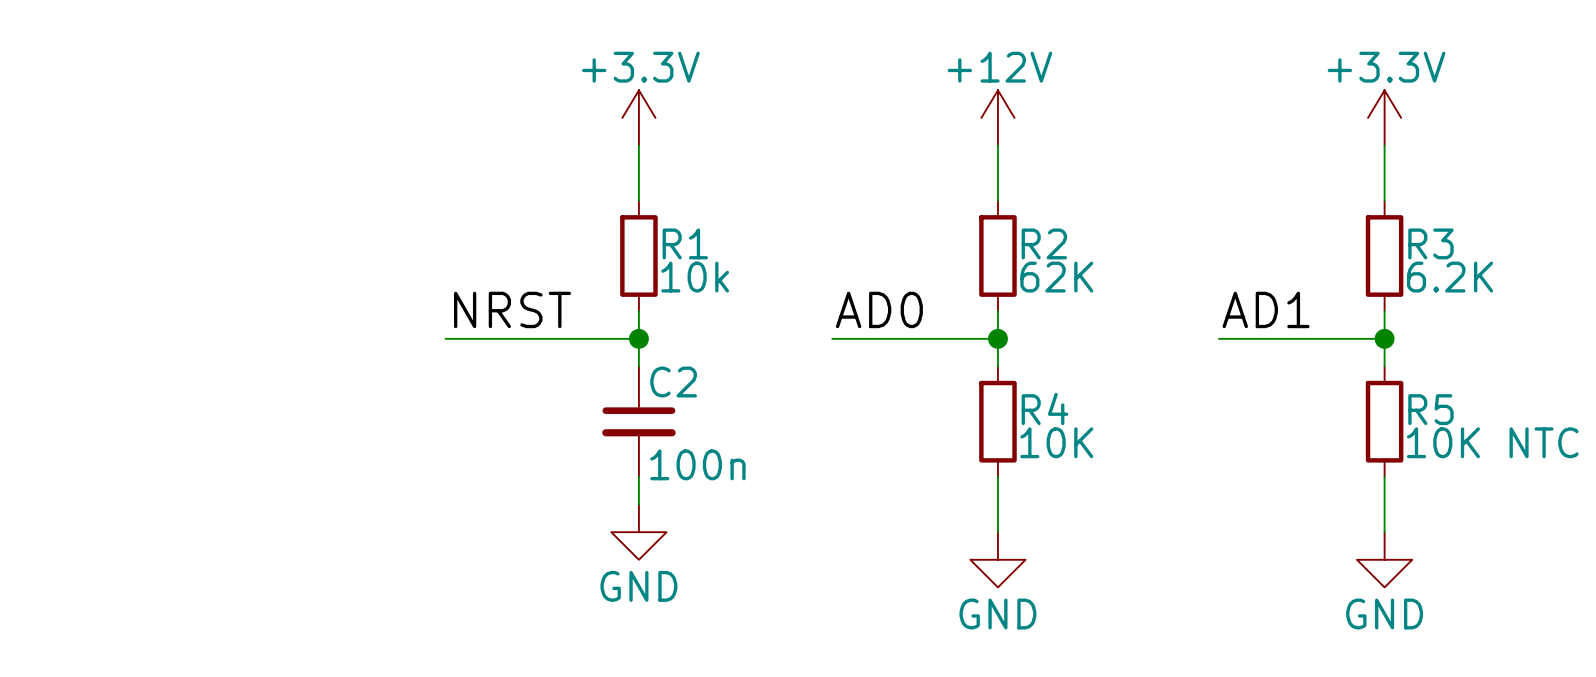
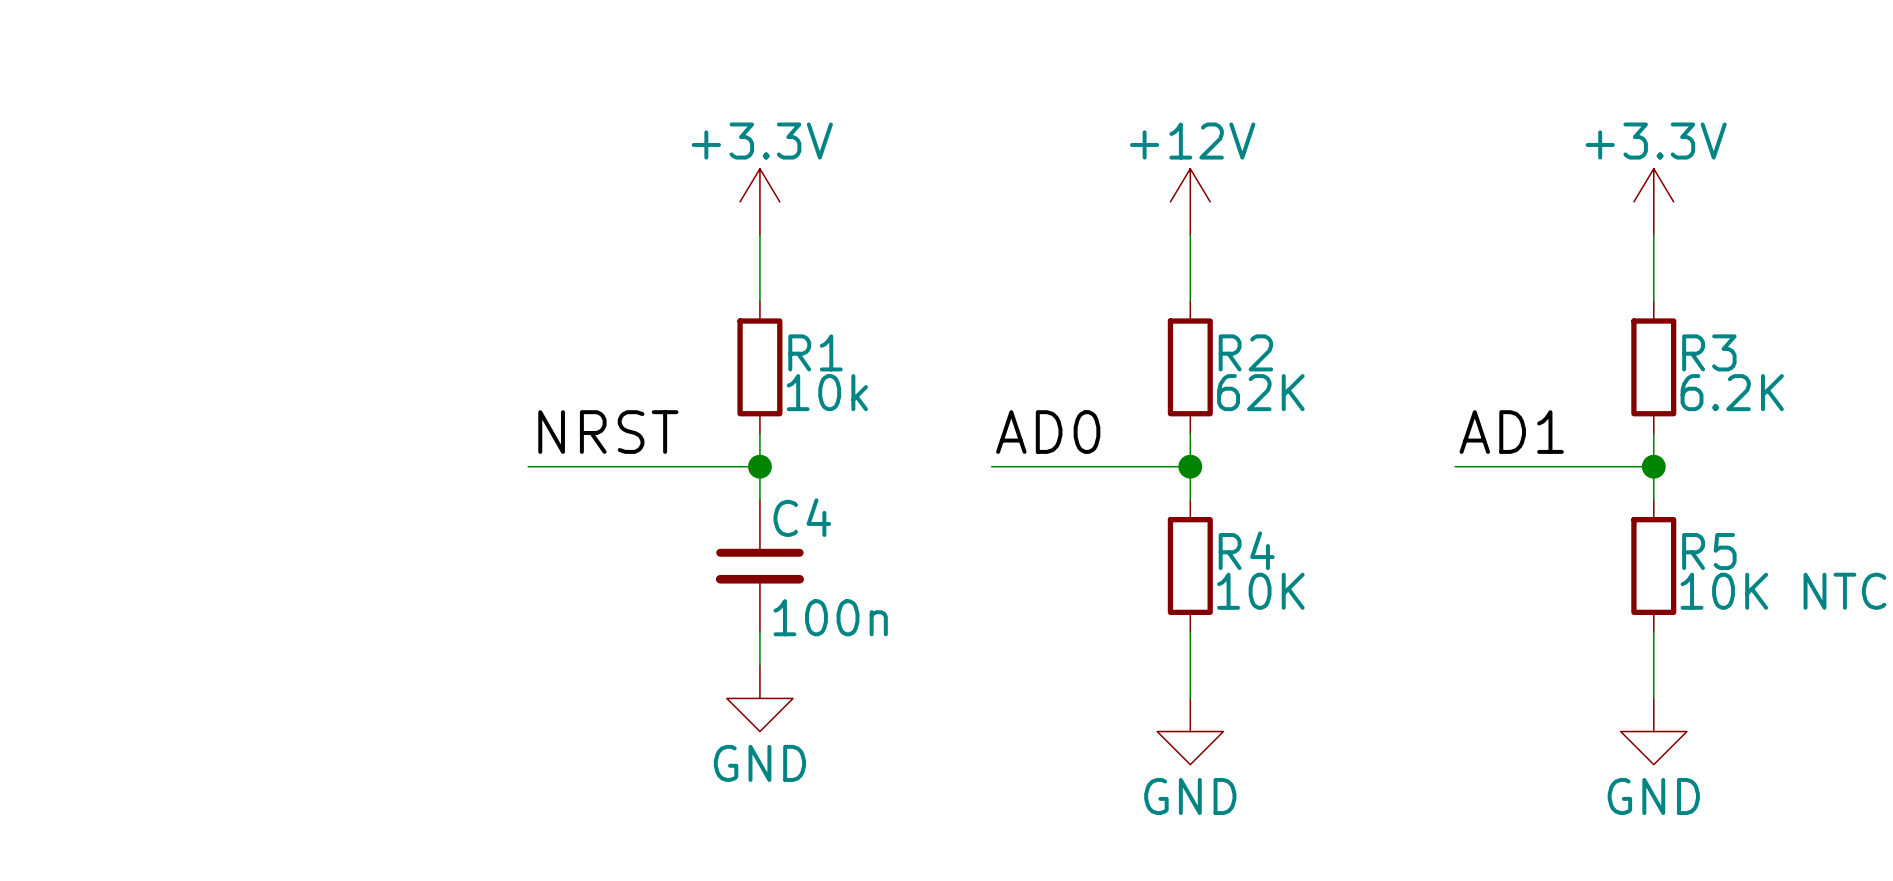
C2 name: C2 (673, 382) -> C4 (802, 517)

